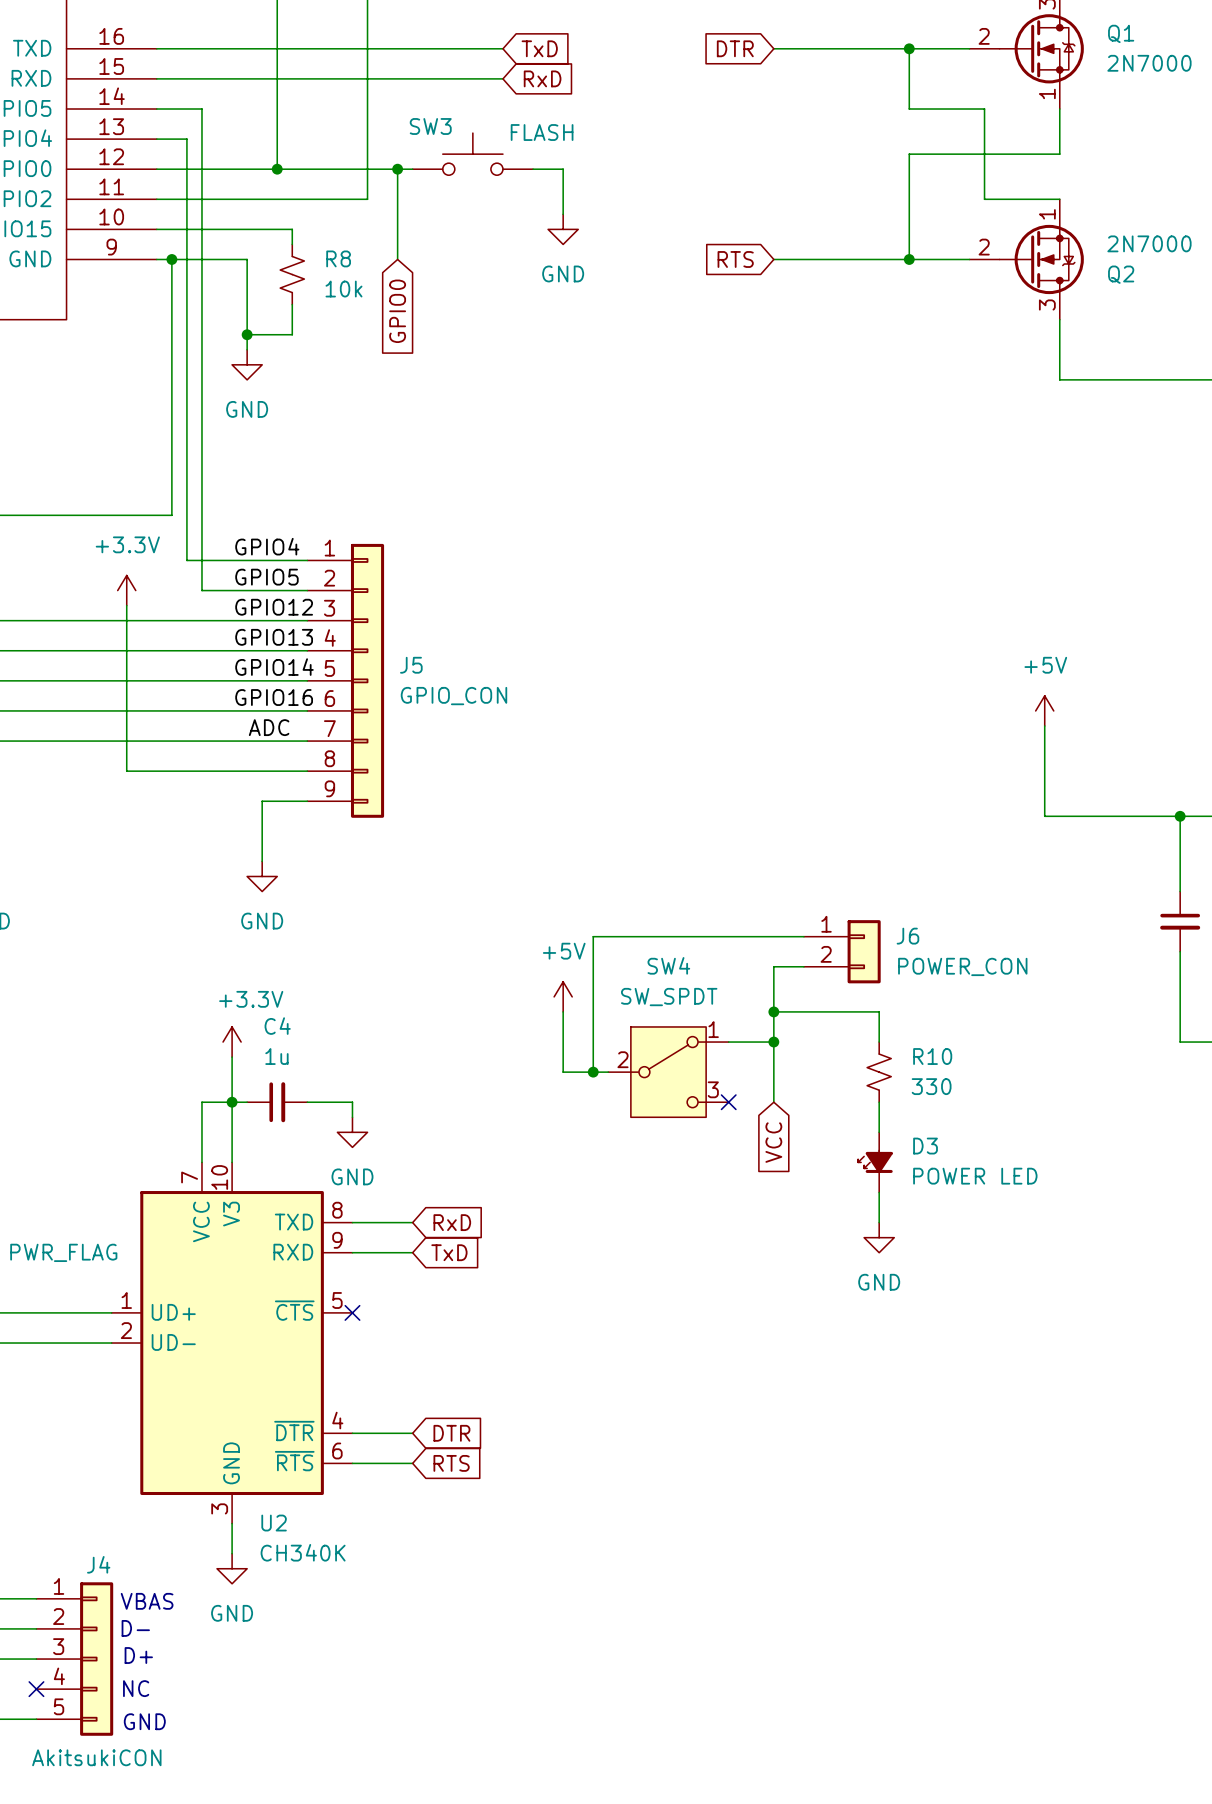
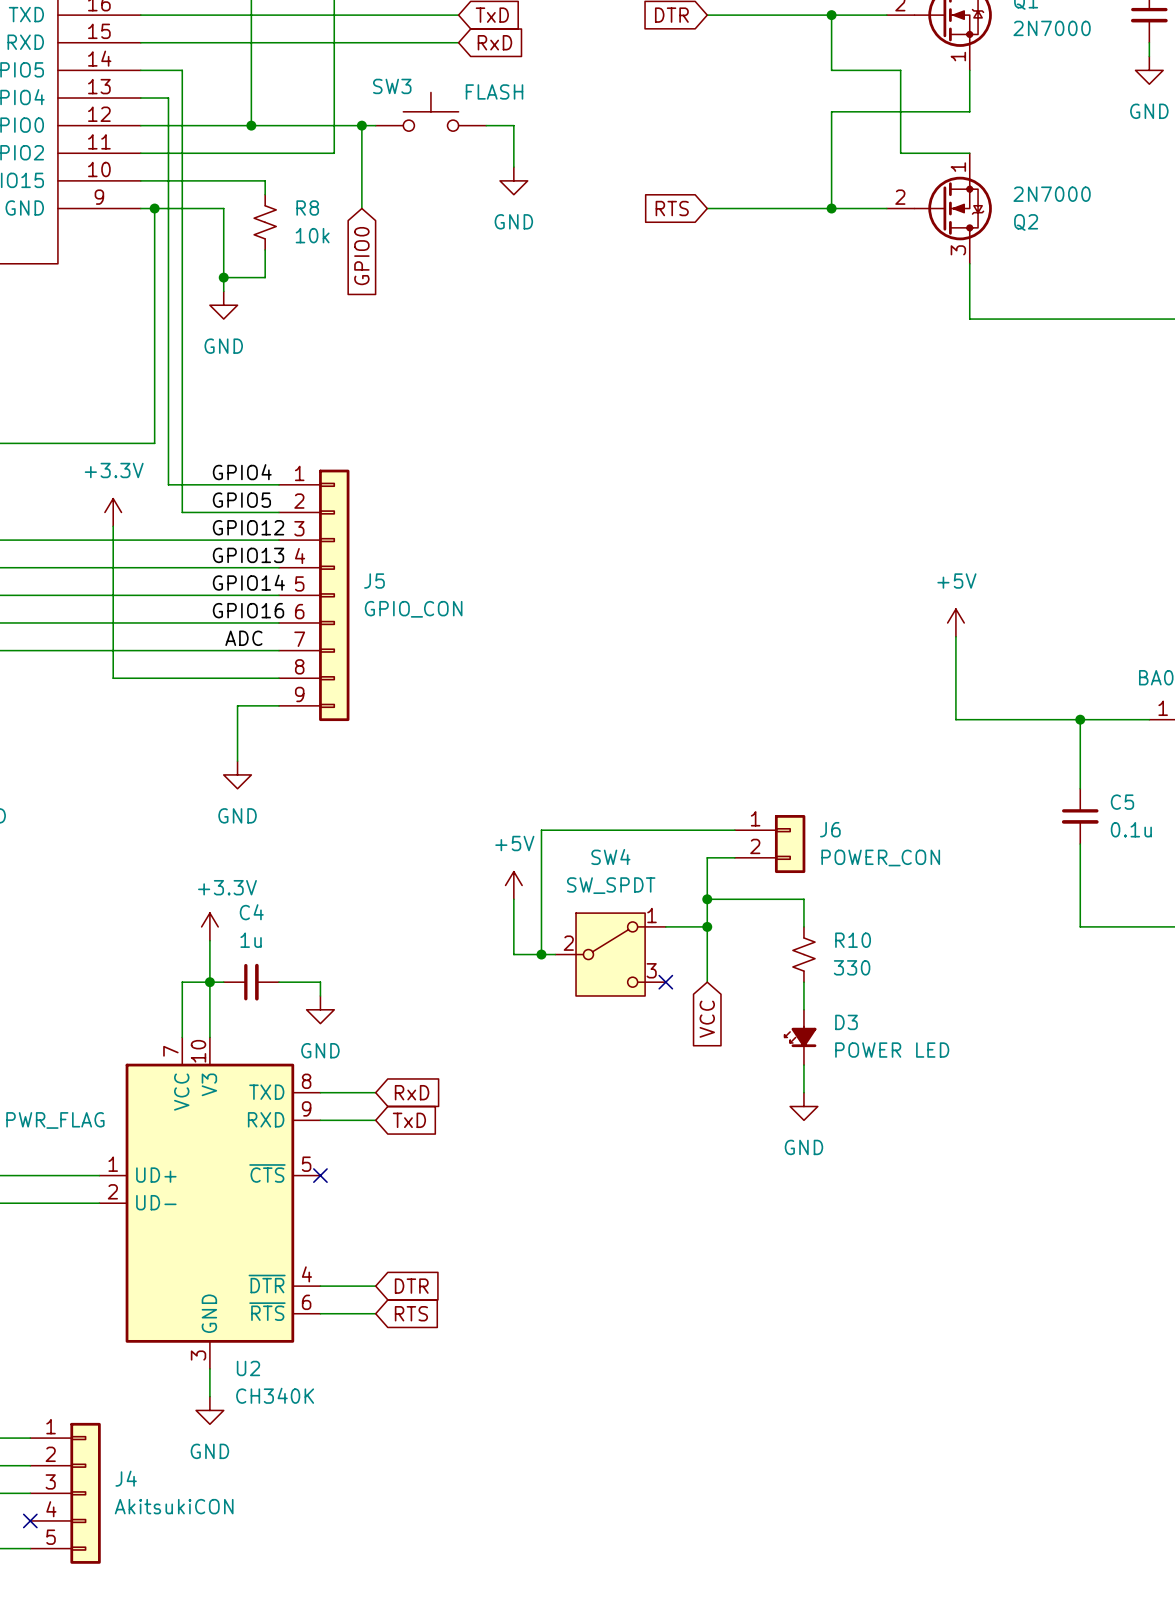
J4 name position: J4 (98, 1564) -> J4 (126, 1478)
text: VBAS (147, 1601) -> none
text: D- (135, 1628) -> none
text: D+ (138, 1655) -> none
text: NC (136, 1688) -> none
text: GND (144, 1721) -> none
J4 value position: AkitsukiCON (96, 1757) -> AkitsukiCON (174, 1506)

